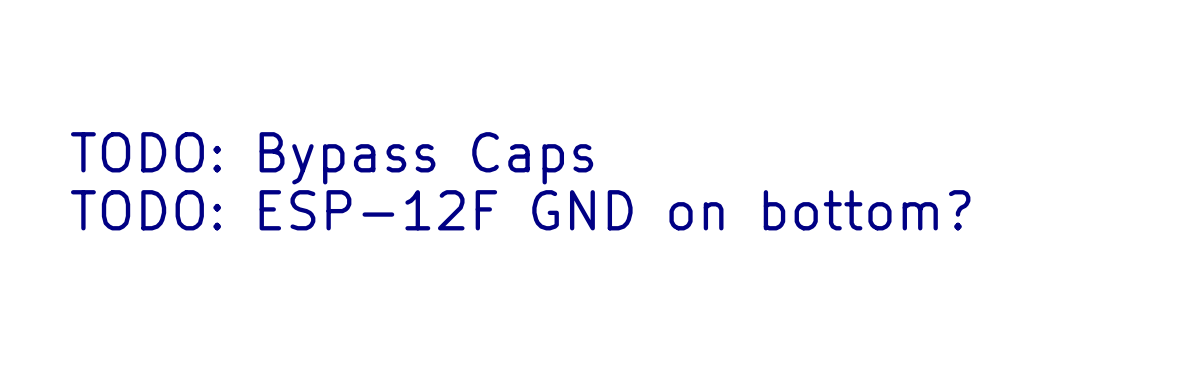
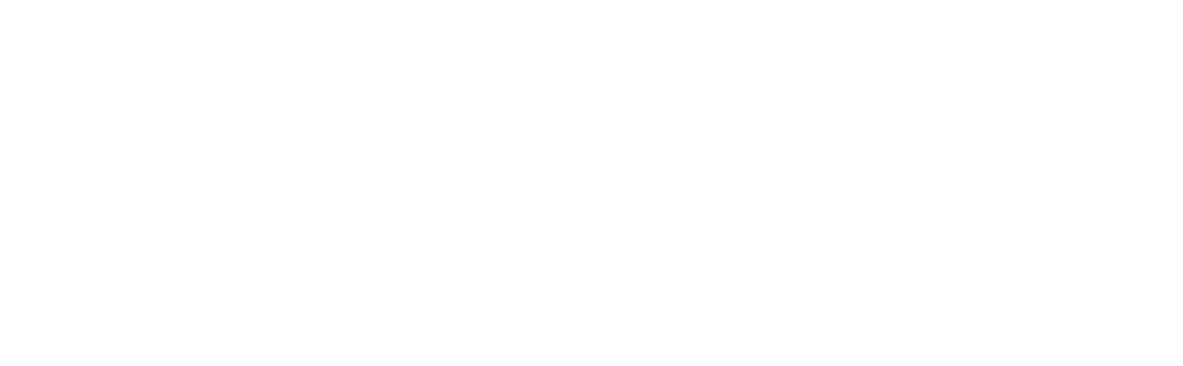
text: TODO: Bypass Caps (332, 158) -> none
text: TODO: ESP-12F GND on bottom? (520, 210) -> none

